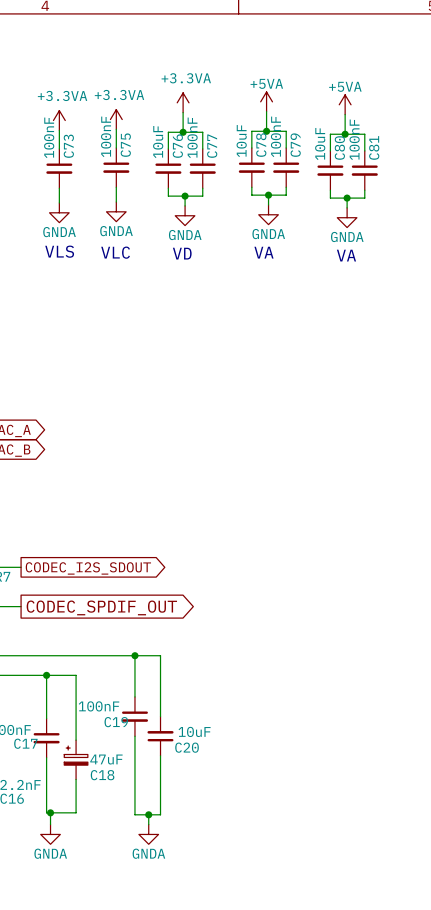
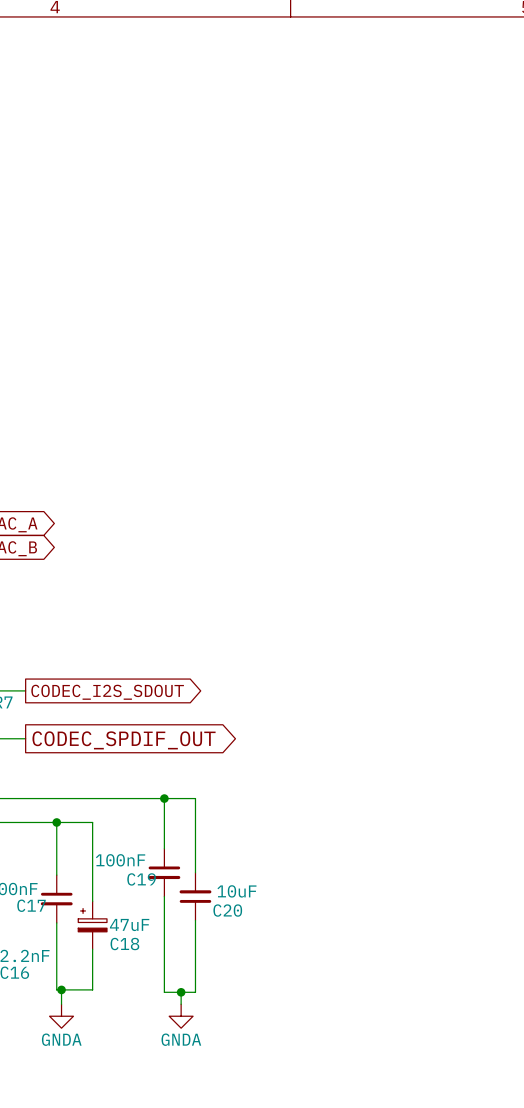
power symbol: +5VA (266, 101) -> none
power symbol: +3.3VA (183, 102) -> none
power symbol: +5VA (345, 104) -> none
wire: (266, 111) (266, 131) -> none
wire: (183, 112) (183, 132) -> none
wire: (345, 114) (345, 134) -> none
power symbol: +3.3VA (116, 119) -> none
power symbol: +3.3VA (59, 120) -> none
wire: (116, 129) (116, 148) -> none
wire: (59, 130) (59, 148) -> none
junction: (266, 131) -> none
junction: (183, 132) -> none
junction: (345, 134) -> none
wire: (168, 148) (168, 132) (202, 132) (202, 148) -> none
wire: (251, 148) (251, 131) (286, 131) (286, 148) -> none
wire: (330, 150) (330, 134) (364, 134) (364, 150) -> none
C75: 100nF (116, 167) -> none
C78: 10uF (251, 167) -> none
C79: 100nF (286, 167) -> none
C73: 100nF (59, 168) -> none
C76: 10uF (168, 168) -> none
C77: 100nF (202, 168) -> none
C80: 10uF (330, 170) -> none
C81: 100nF (364, 170) -> none
wire: (116, 187) (116, 202) -> none
wire: (251, 187) (251, 195) (286, 195) (286, 187) -> none
wire: (59, 188) (59, 202) -> none
wire: (168, 188) (168, 196) (202, 196) (202, 188) -> none
wire: (330, 190) (330, 198) (364, 198) (364, 190) -> none
wire: (268, 195) (268, 204) -> none
junction: (268, 195) -> none
wire: (185, 196) (185, 205) -> none
junction: (185, 196) -> none
wire: (347, 198) (347, 207) -> none
junction: (347, 198) -> none
power symbol: GNDA (116, 211) -> none
power symbol: GNDA (59, 212) -> none
power symbol: GNDA (268, 214) -> none
power symbol: GNDA (185, 215) -> none
power symbol: GNDA (347, 217) -> none
text: VLS (59, 251) -> none
text: VLC (115, 252) -> none
text: VA (263, 252) -> none
text: VD (182, 253) -> none
text: VA (346, 255) -> none

